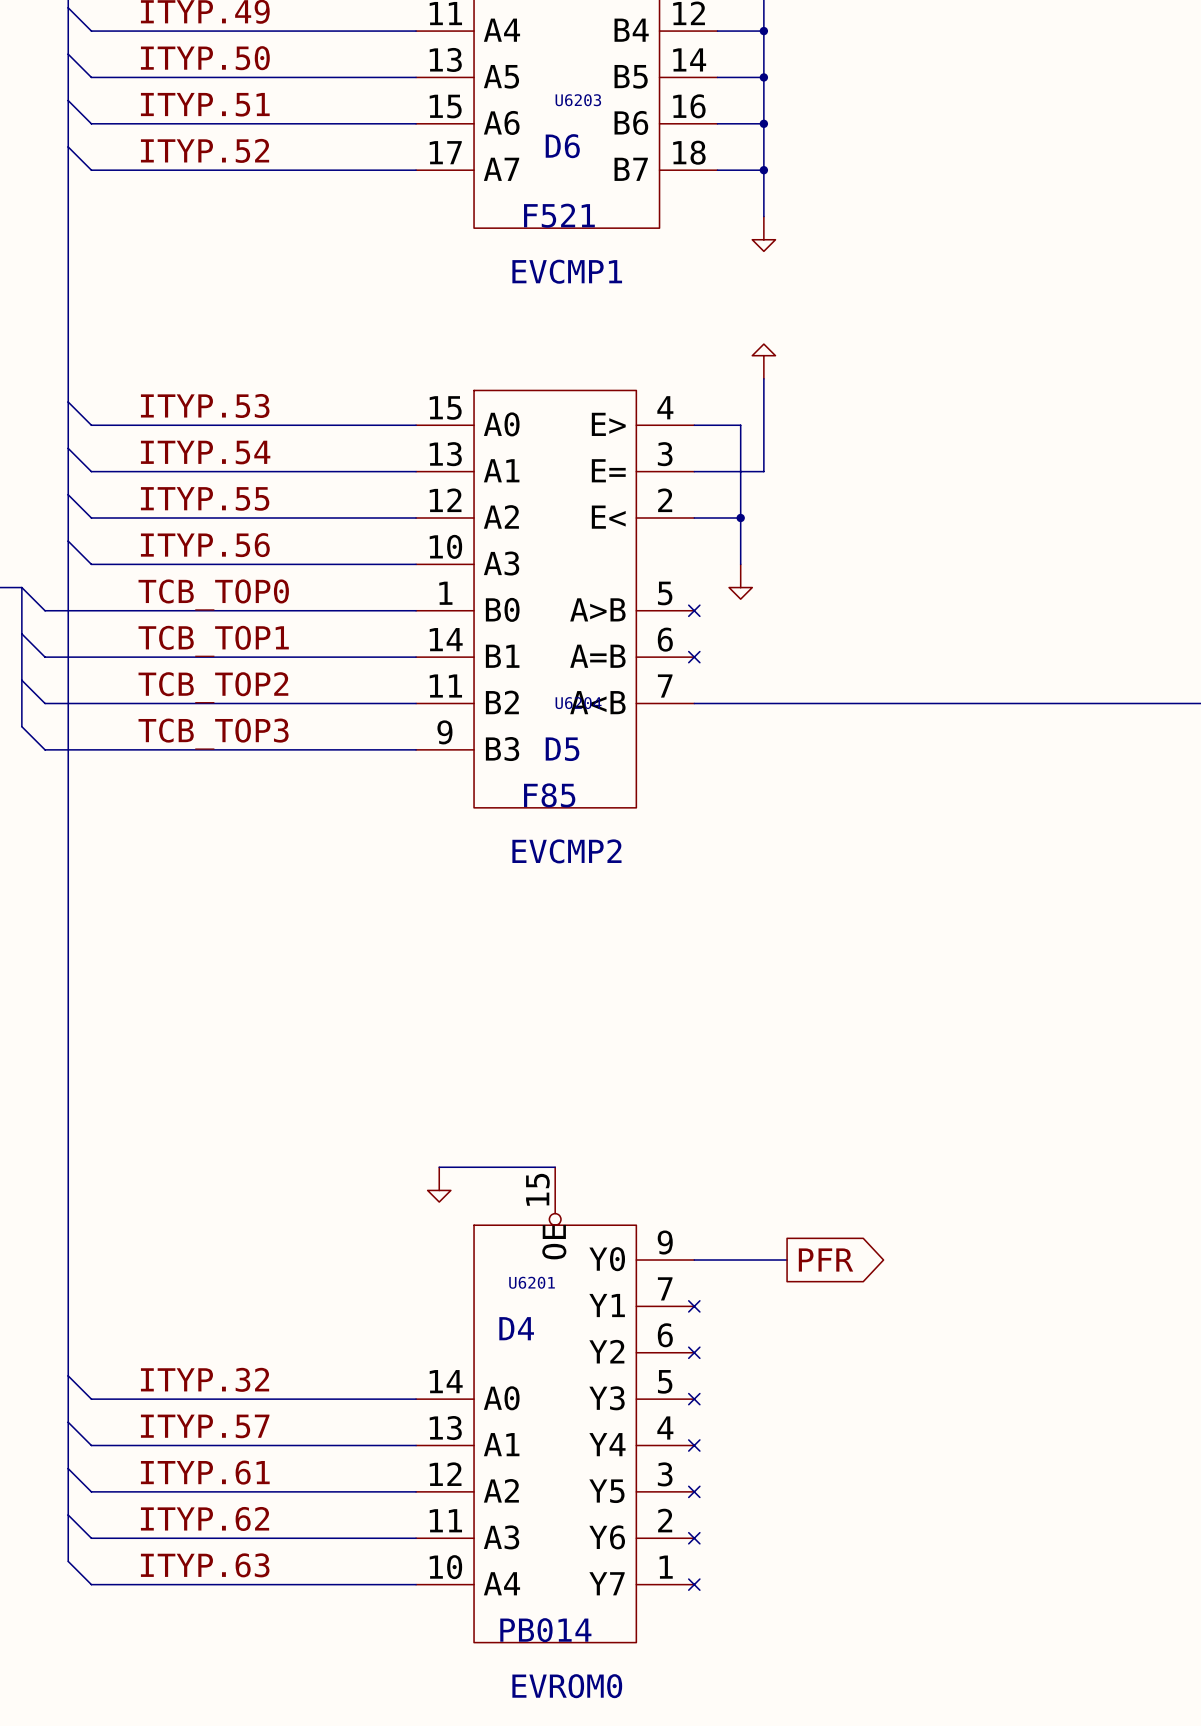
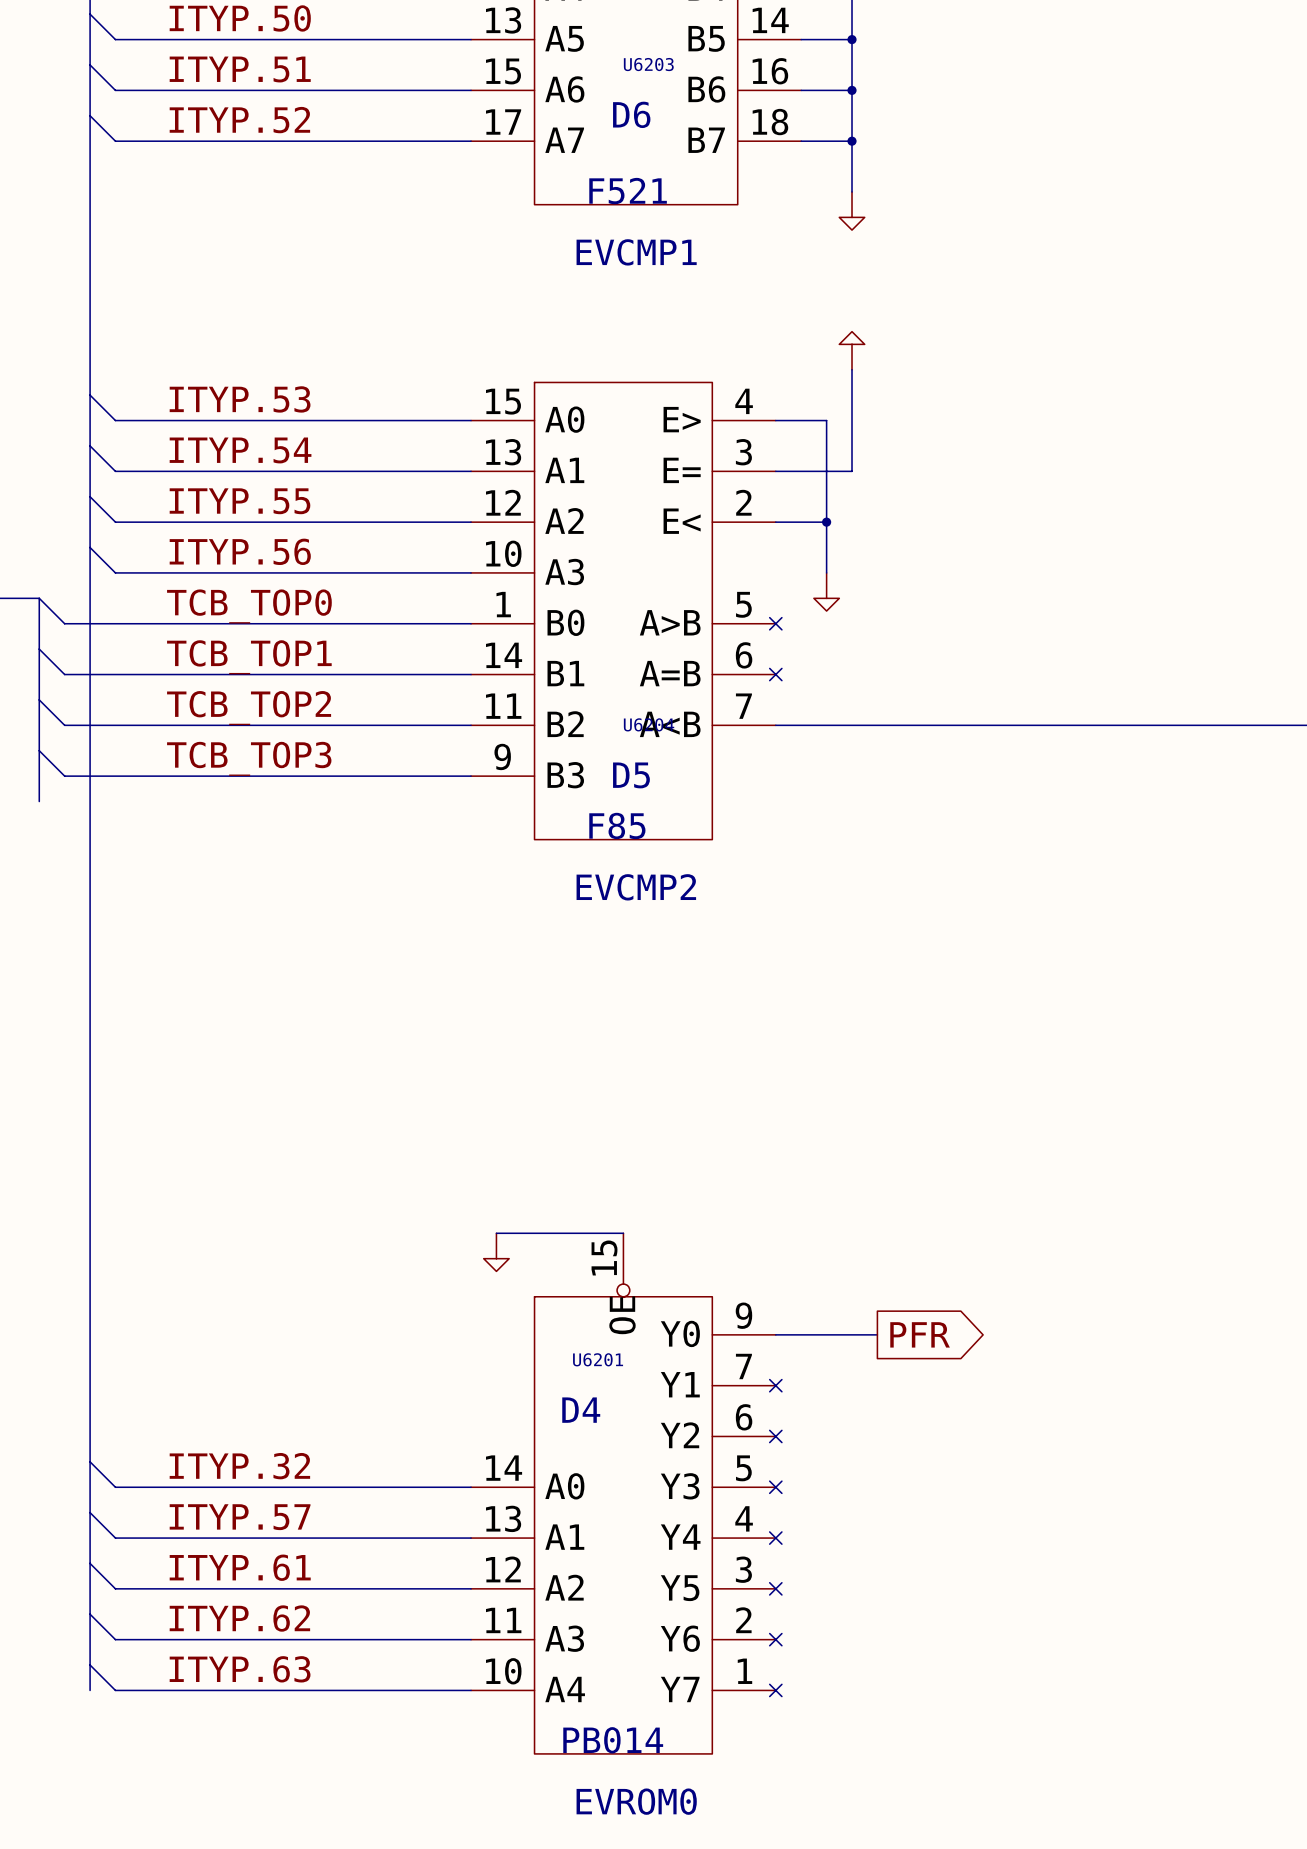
bus: none -> (39, 750) (39, 801)
bus: none -> (90, 1665) (90, 1690)

